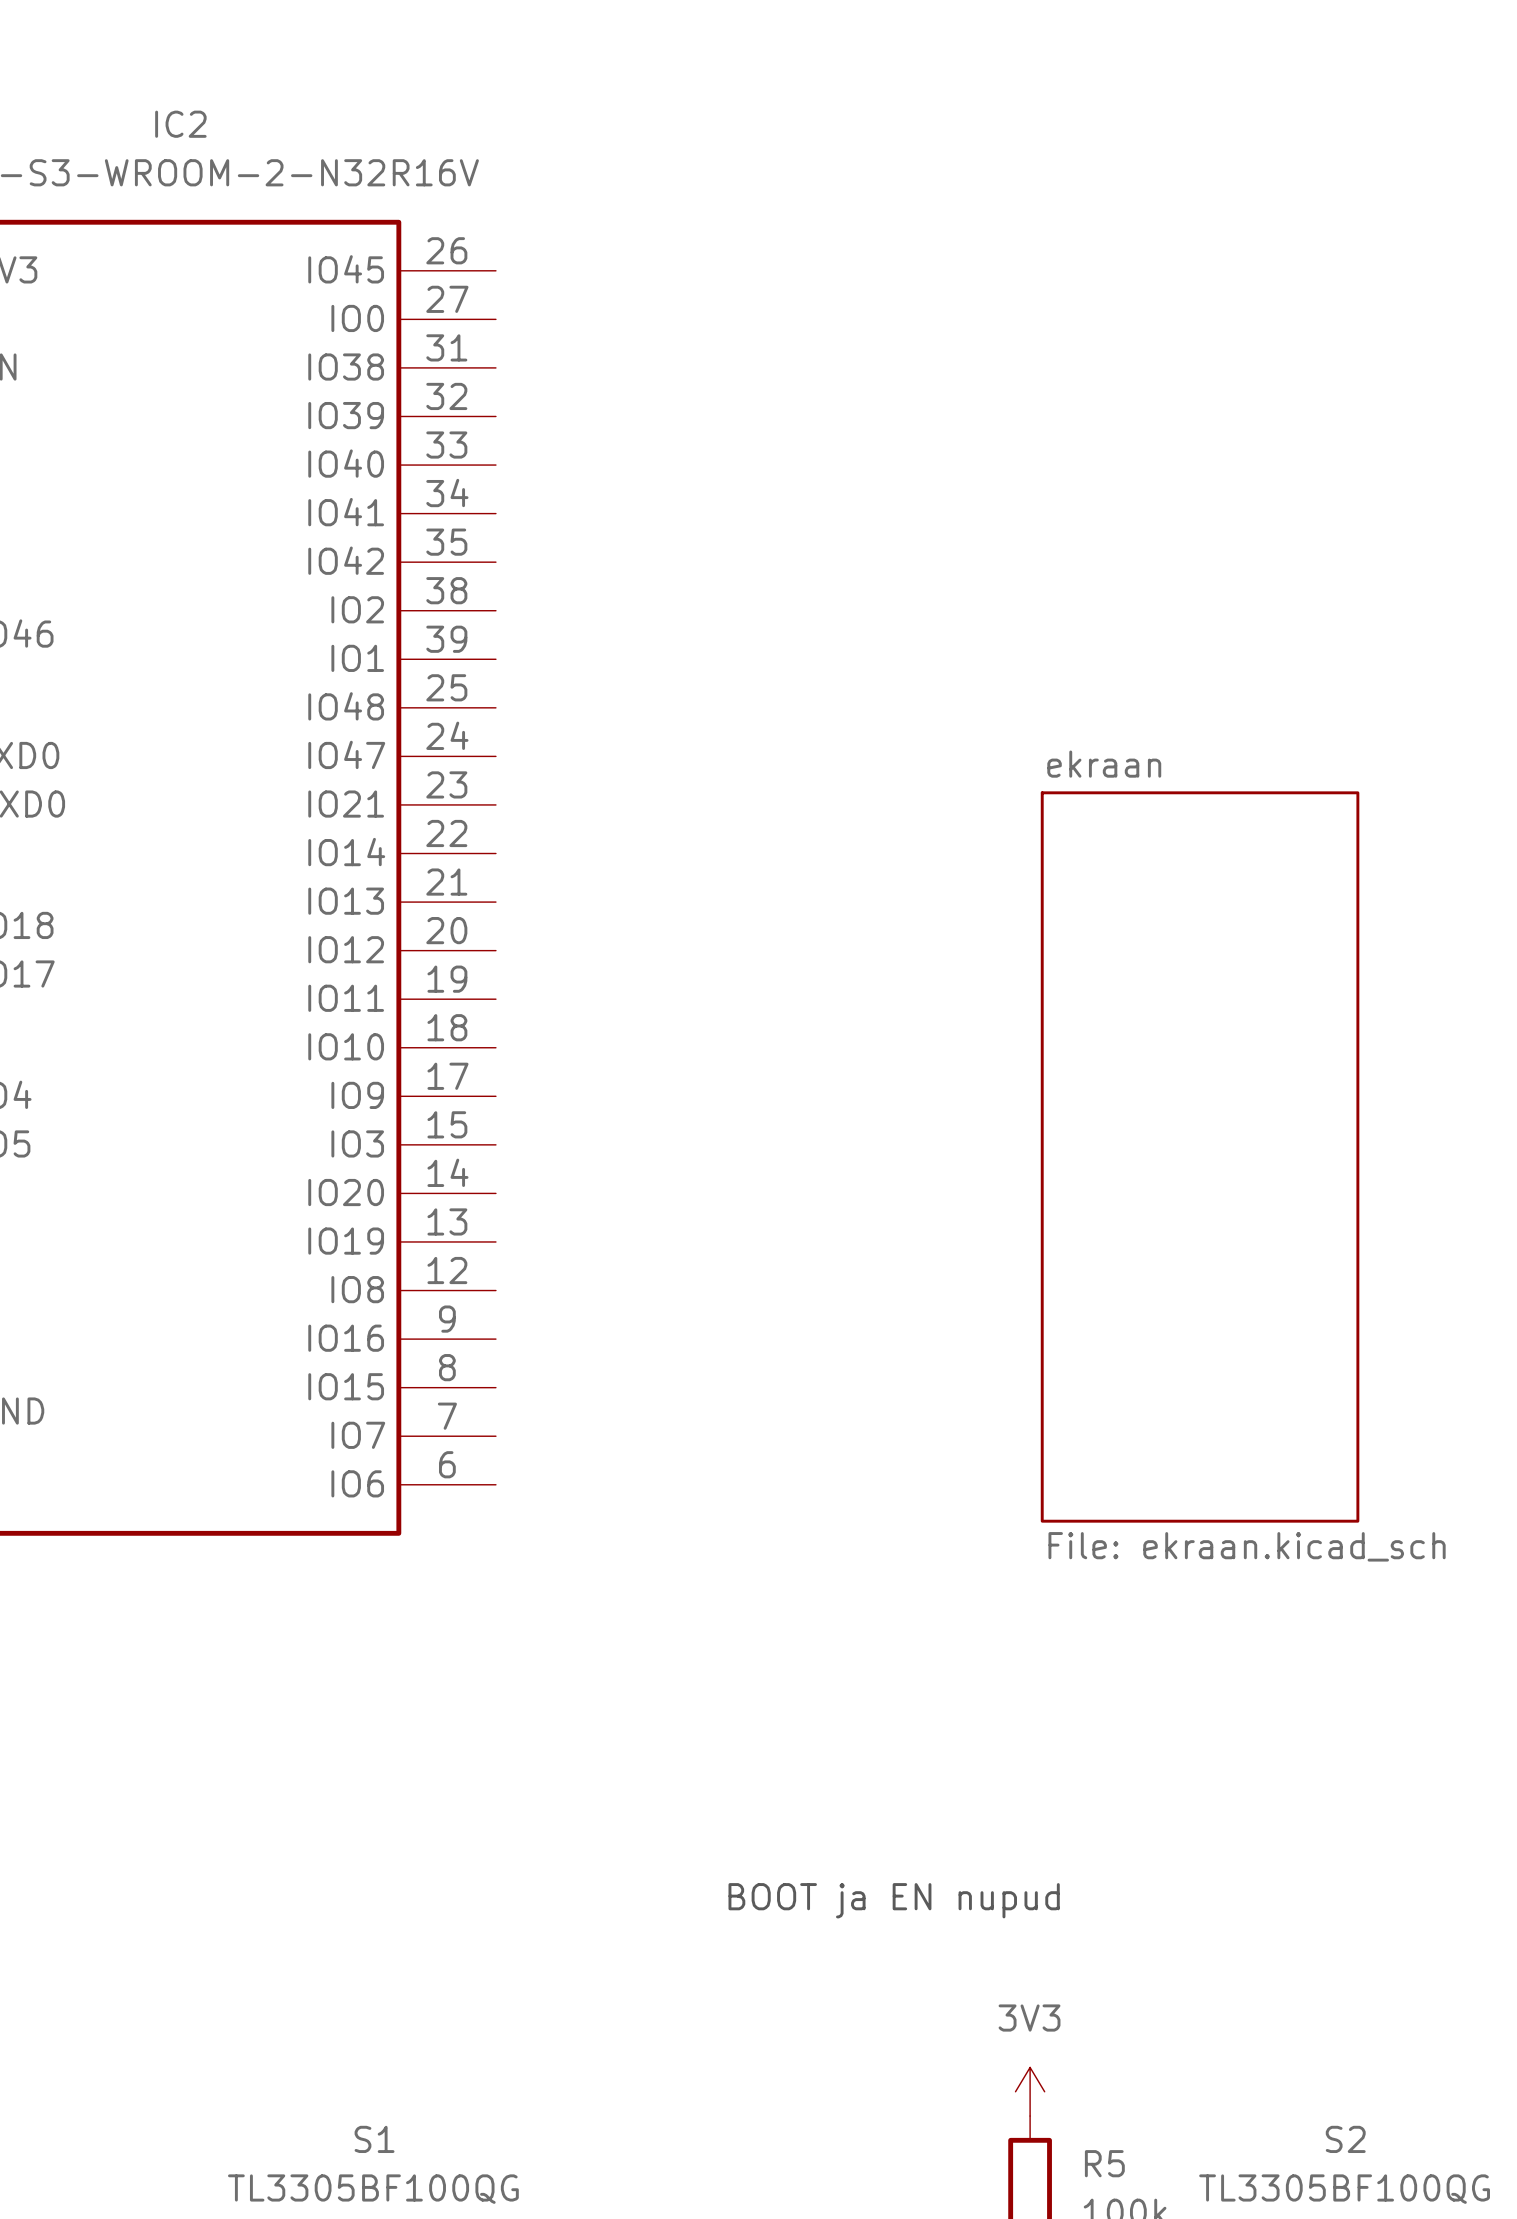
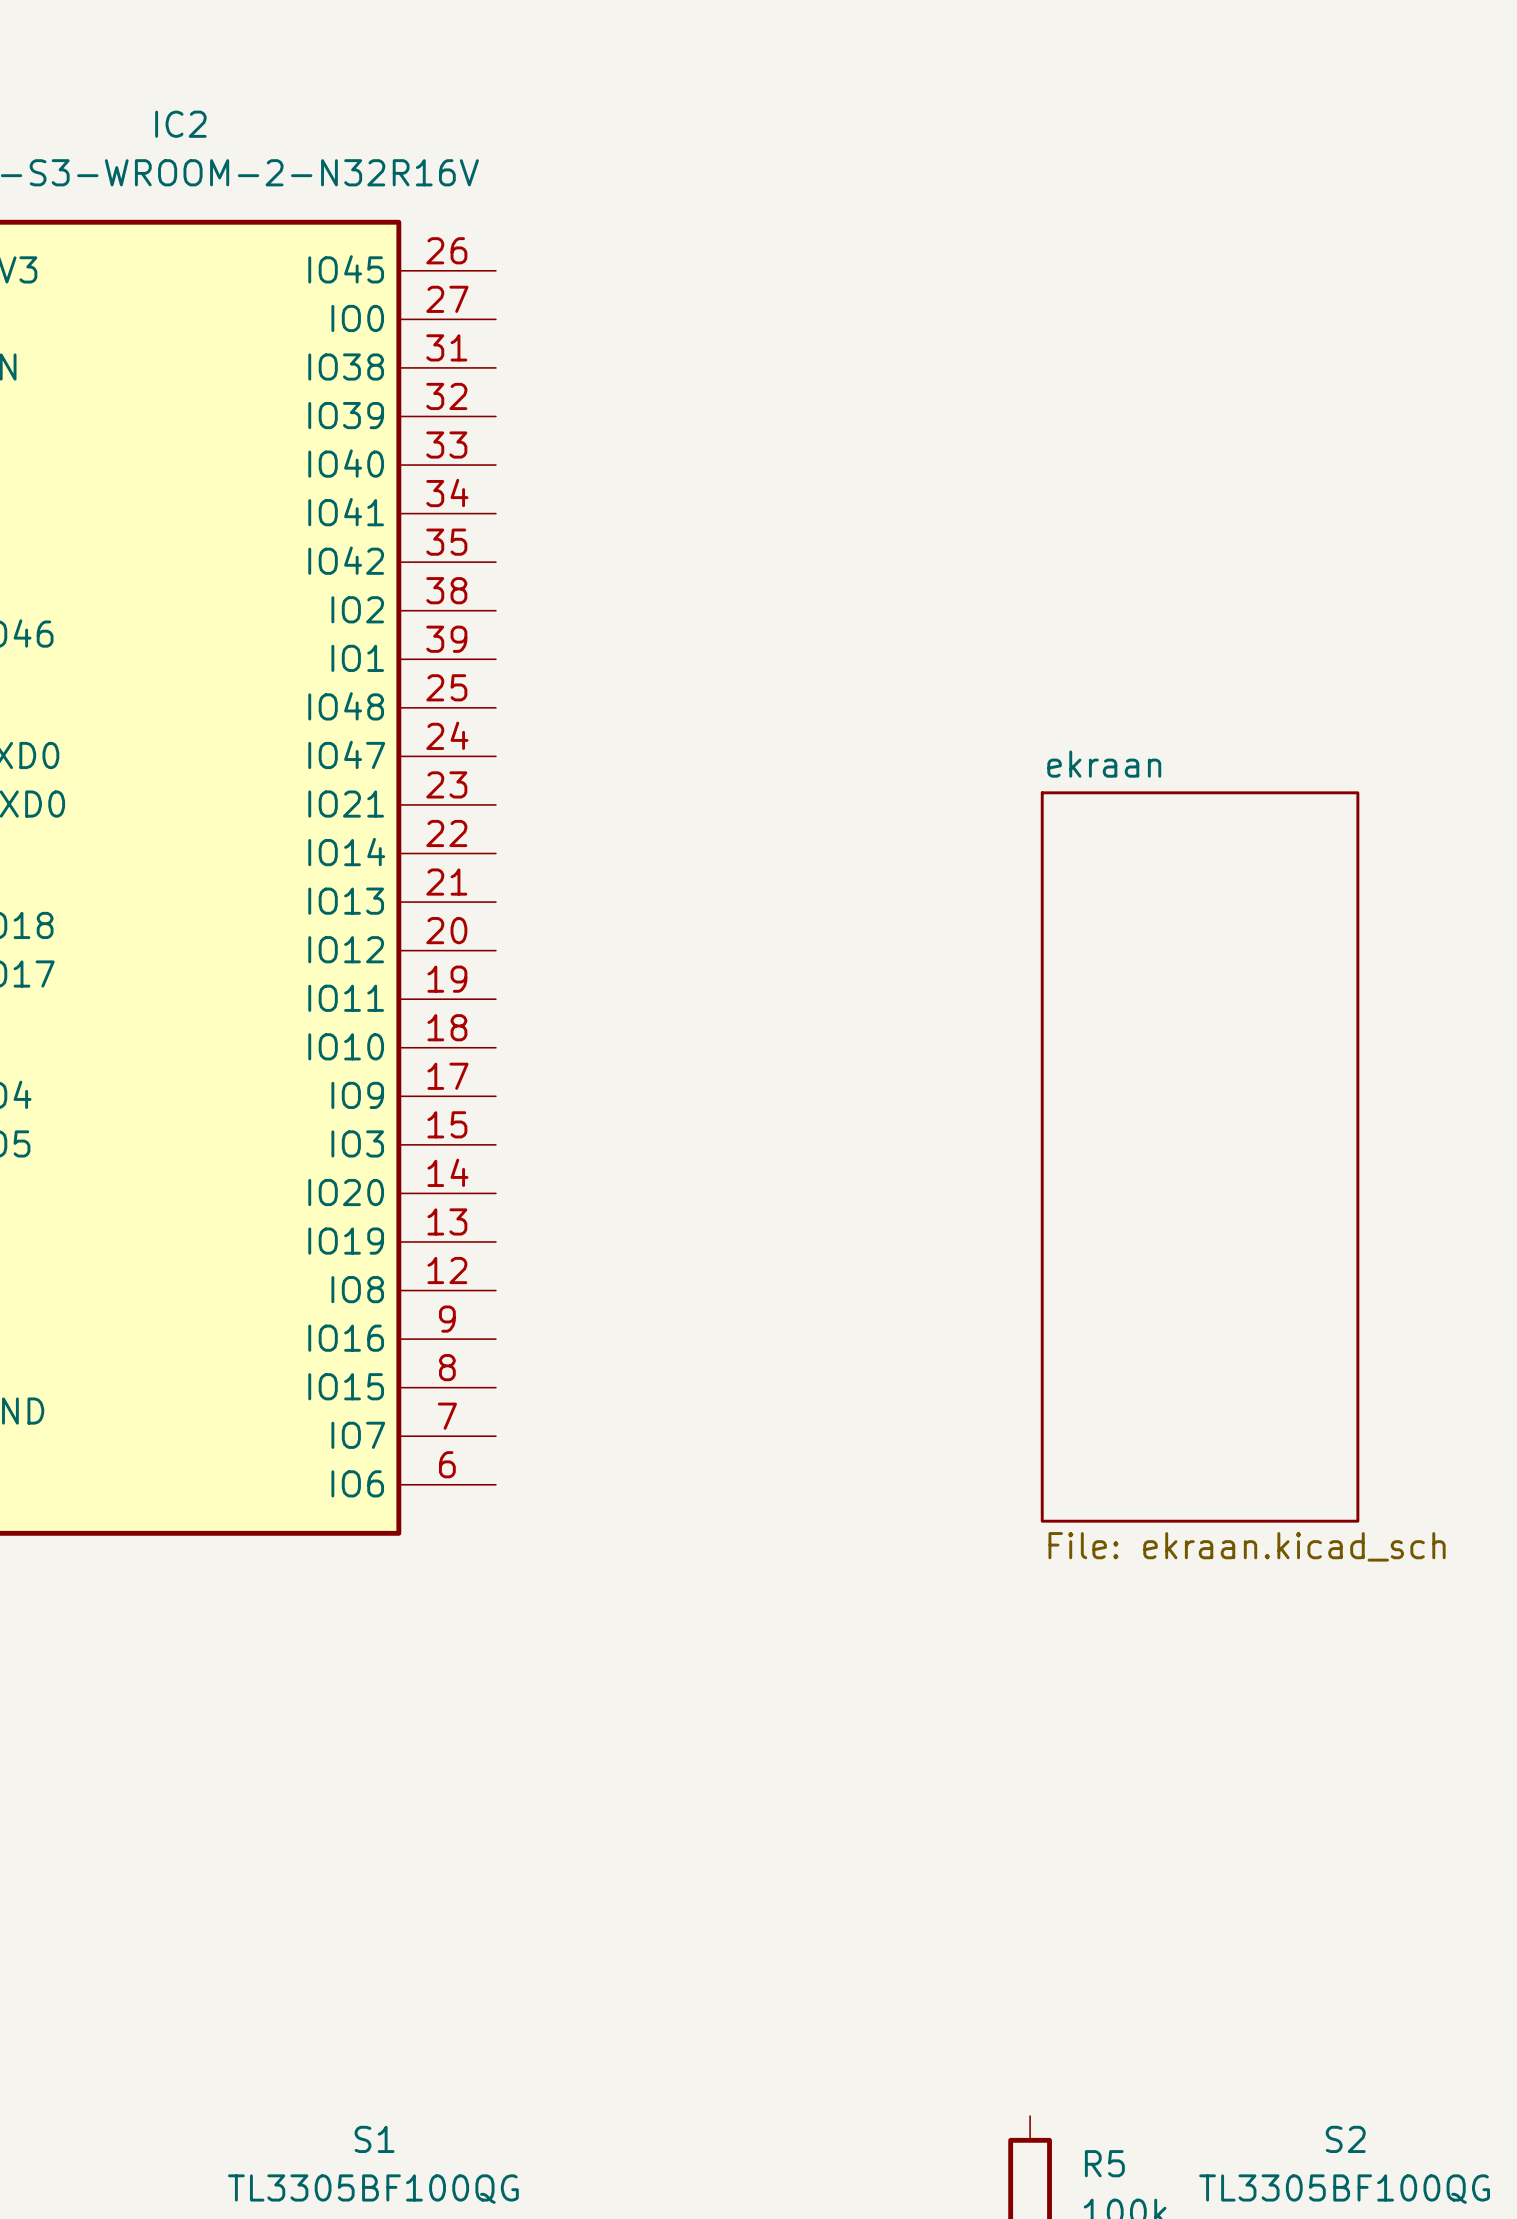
text: BOOT ja EN nupud (894, 1900) -> none
power symbol: 3V3 (1030, 2091) -> none

